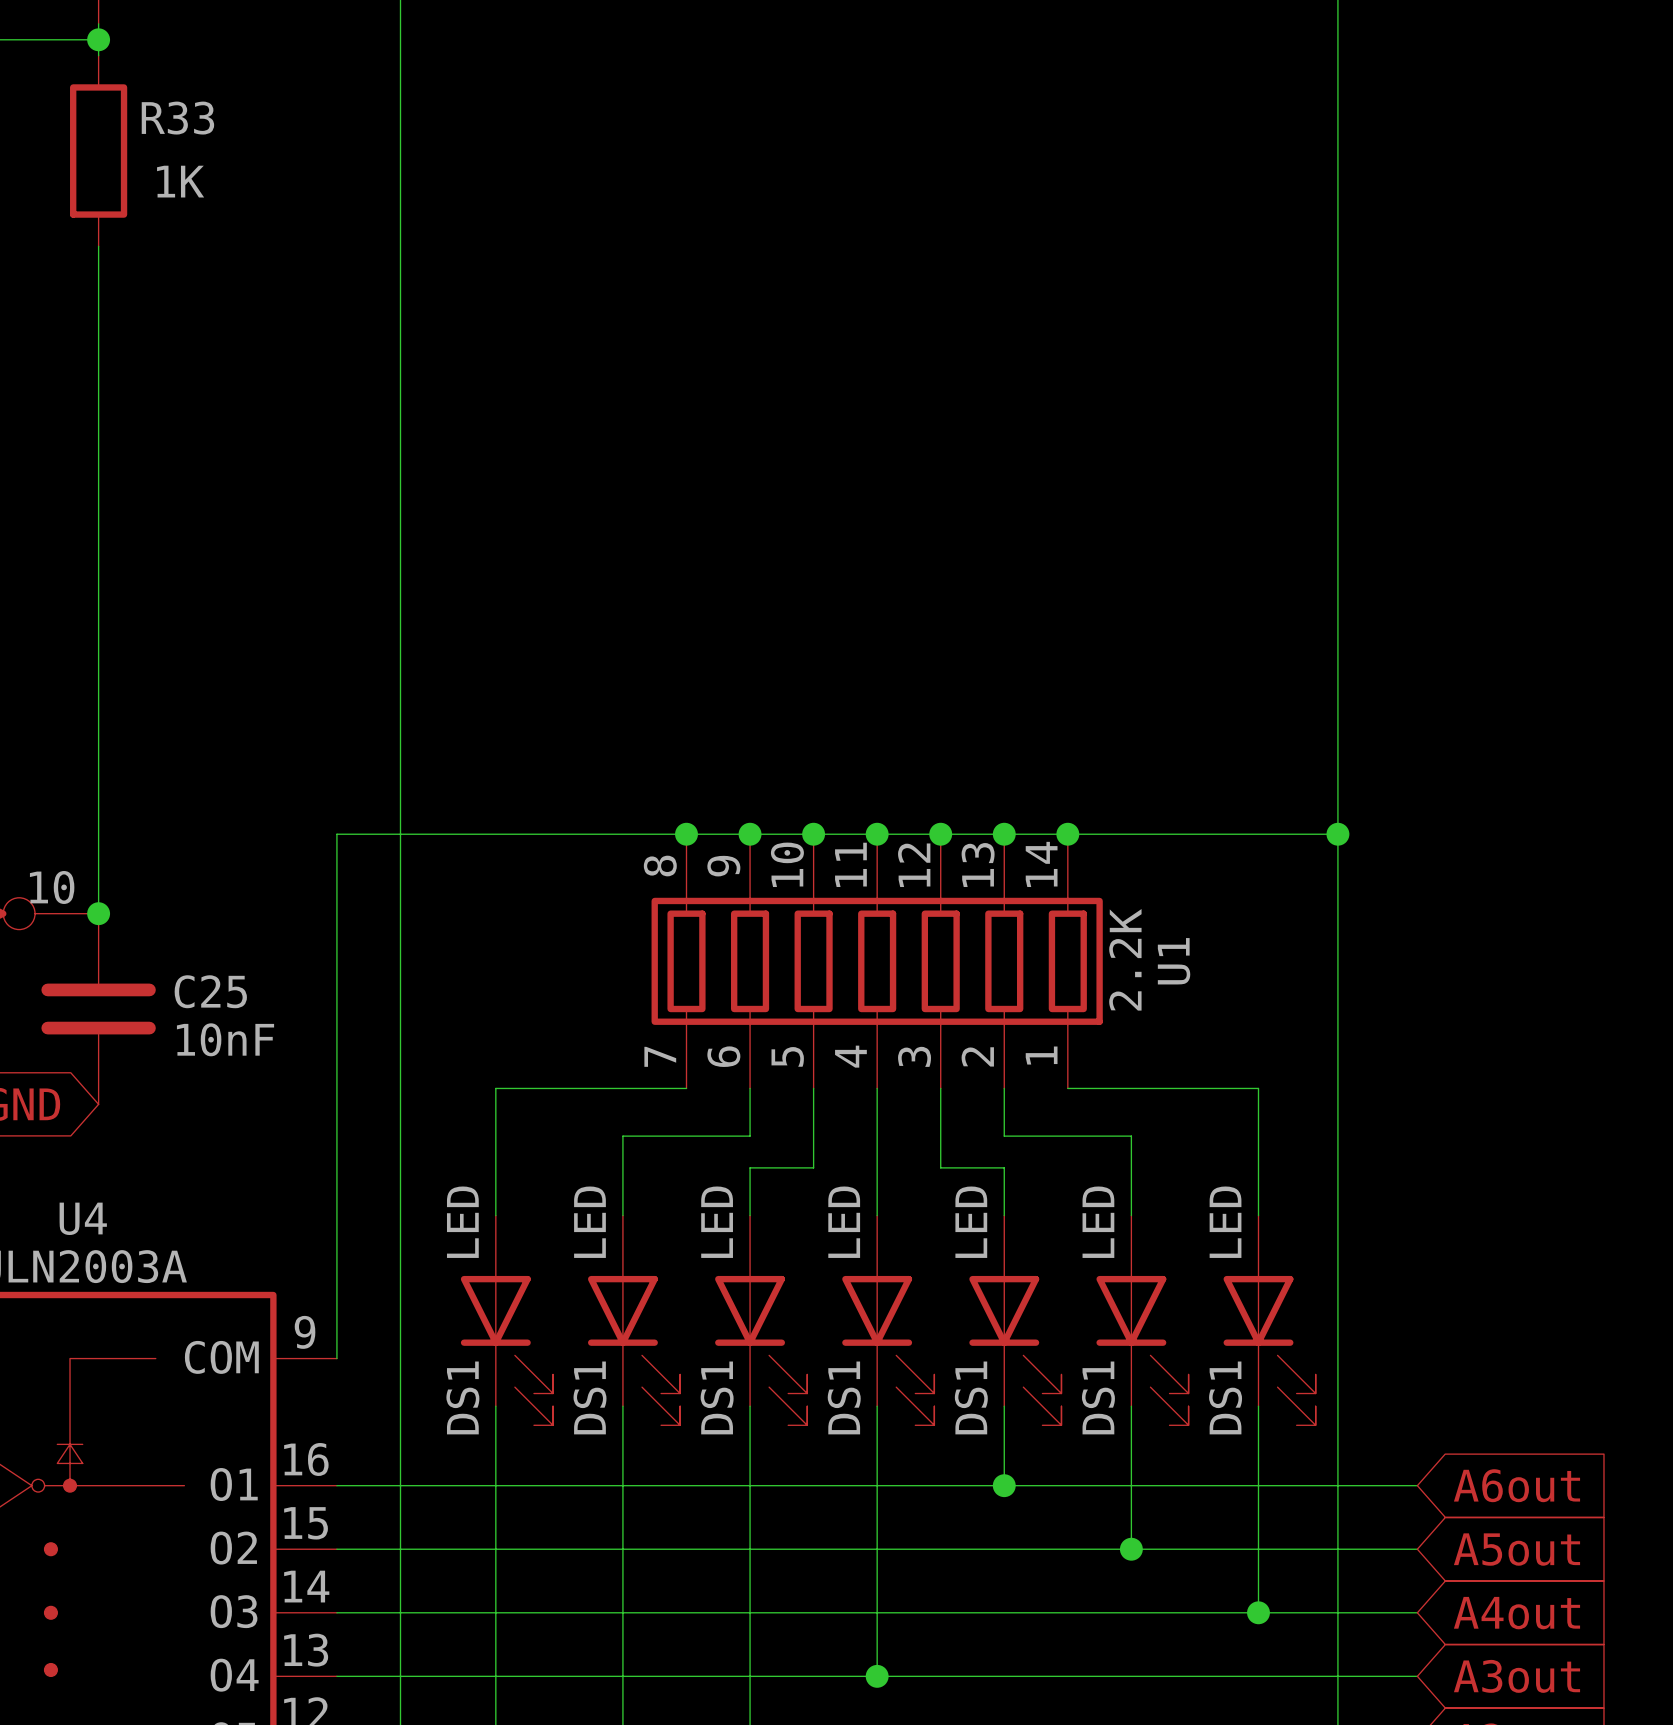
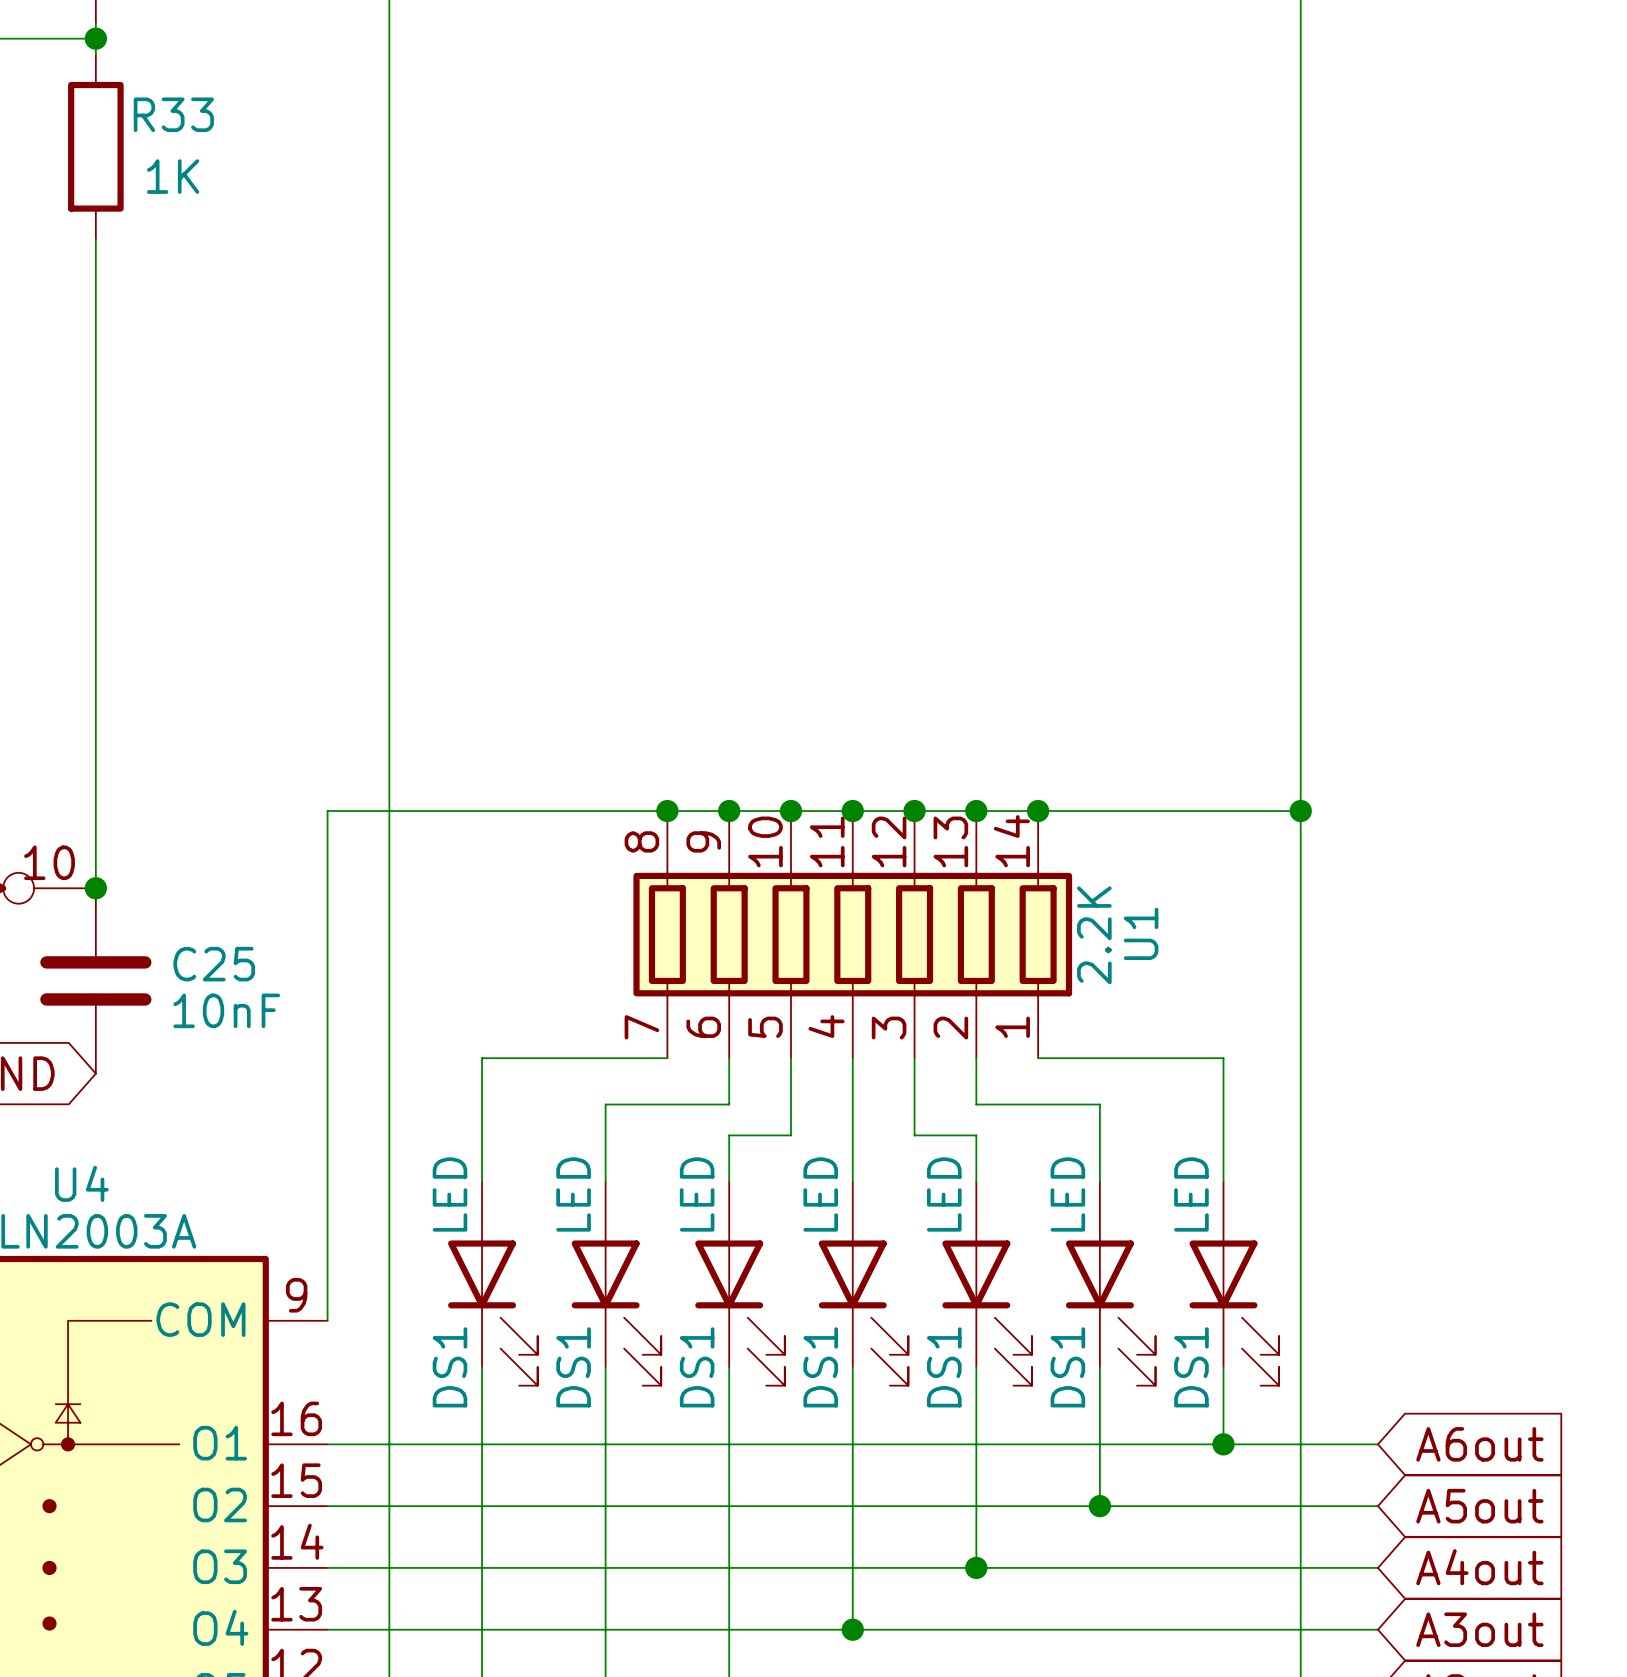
junction: (1004, 1485) -> none
wire: (1258, 1485) (1258, 1612) -> (976, 1444) (976, 1567)
junction: none -> (1223, 1444)
junction: none -> (976, 1567)
junction: (1258, 1612) -> none

